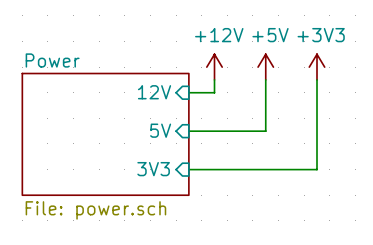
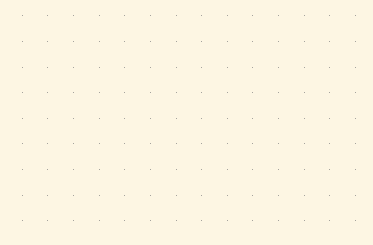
power symbol: +12V (214, 67) -> none
power symbol: +5V (265, 67) -> none
power symbol: +3V3 (316, 67) -> none
wire: (214, 79) (214, 92) (188, 92) -> none
wire: (265, 79) (265, 131) (188, 131) -> none
wire: (316, 79) (316, 169) (188, 169) -> none
sheet pin: 12V (154, 92) -> none
sheet pin: 5V (160, 130) -> none
sheet Power: File: power.sch (105, 134) -> none
sheet pin: 3V3 (153, 169) -> none

